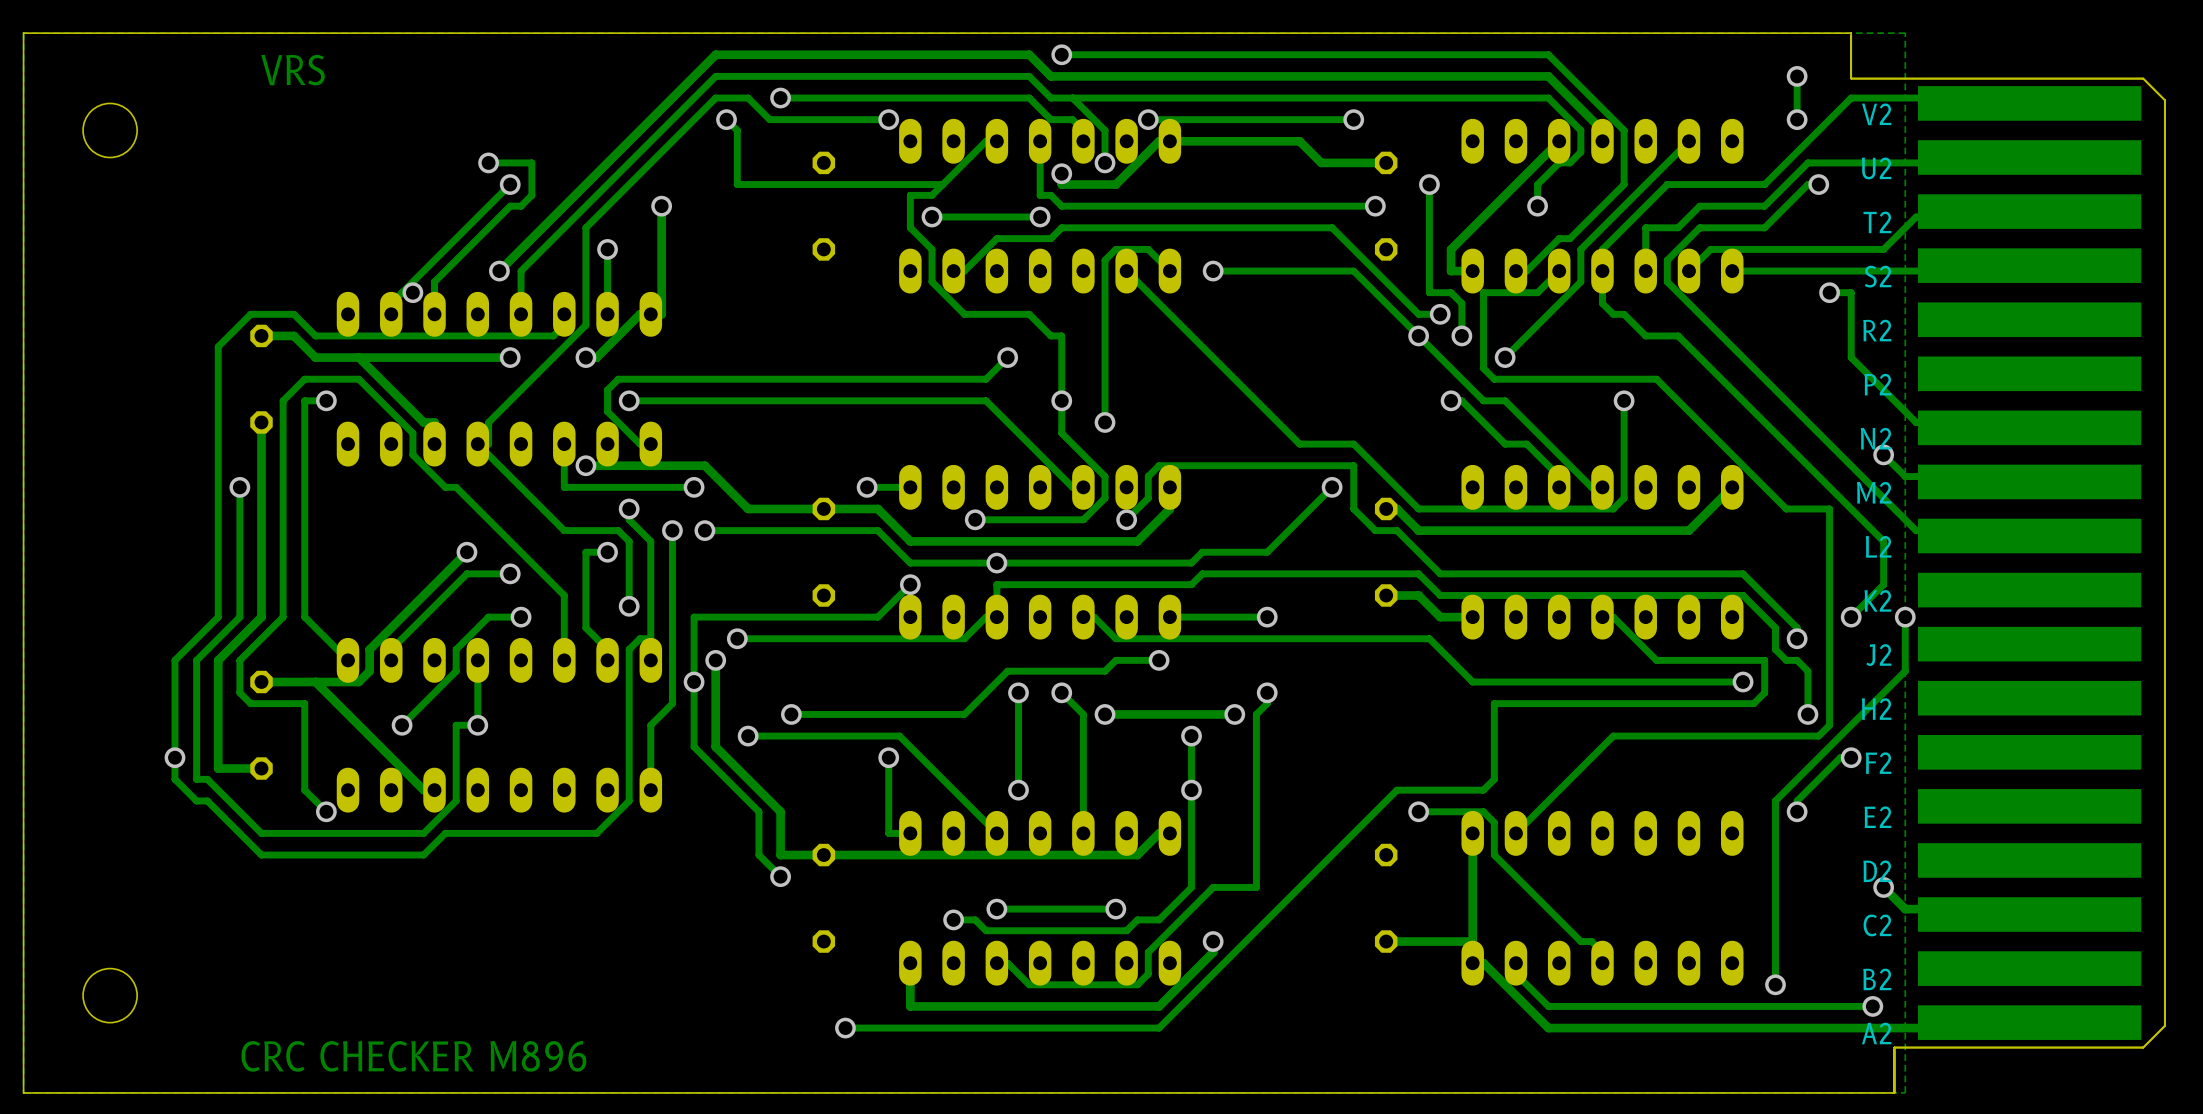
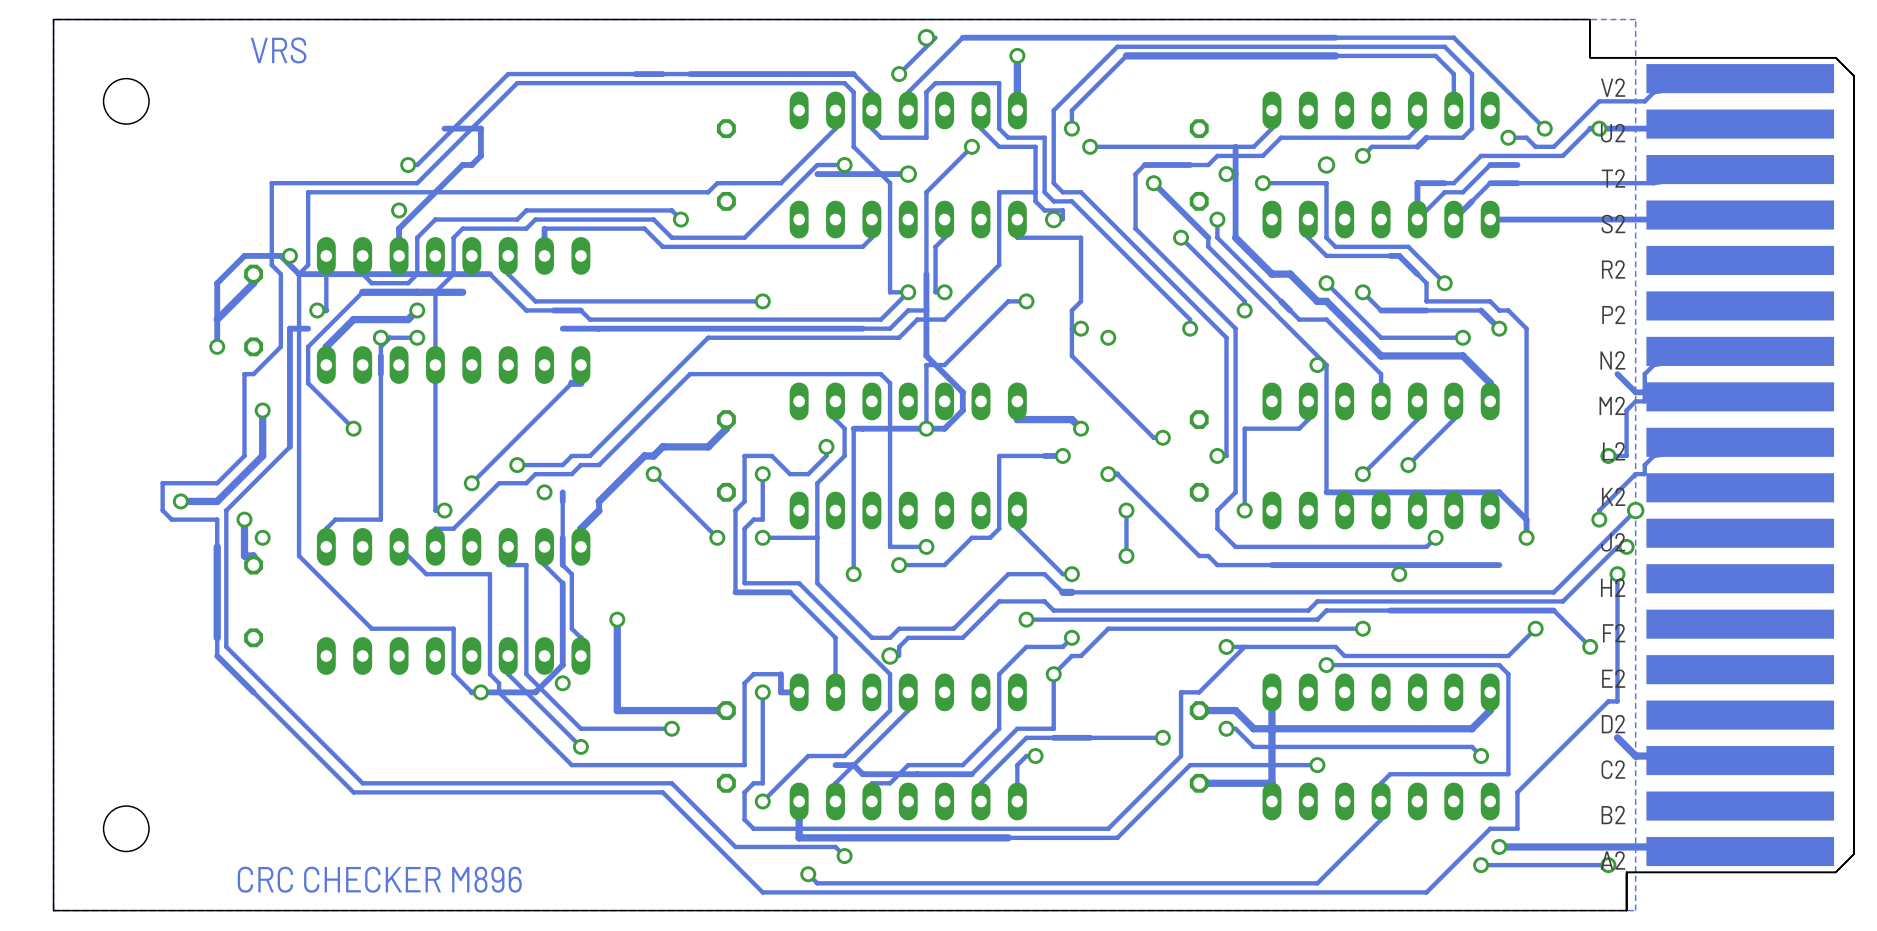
track: none -> (935, 37) (899, 74)
track: (1105, 54) (1061, 54) -> (962, 37) (908, 92) (908, 110)
track: (1548, 54) (1624, 130) (1624, 184) (1570, 238) (1559, 238) (1526, 271) (1515, 271) -> (1390, 255) (1326, 255) (1308, 237) (1308, 219)
track: none -> (1335, 37) (1453, 37) (1544, 128)
track: none -> (1017, 55) (1017, 110)
via: none -> (1017, 55)
track: (1299, 76) (1050, 76) (1029, 54) (715, 54) (499, 271) -> (1126, 55) (1071, 110) (1071, 128)
track: (1548, 76) (1602, 130) (1602, 141) -> (1335, 55) (1435, 55) (1453, 74) (1453, 110)
track: (1797, 76) (1797, 119) -> none
via: (1797, 76) -> none
track: (715, 98) (585, 227) (585, 325) (488, 422) (488, 444) (477, 444) (564, 530) (618, 530) (629, 541) (629, 595) -> (635, 74) (508, 74) (417, 165) (408, 165)
track: (748, 98) (769, 119) (888, 119) -> (662, 74) (690, 74)
via: (780, 98) -> none
track: (975, 98) (1029, 98) (1050, 119) (1072, 119) (1083, 130) (1083, 141) -> (853, 74) (871, 92) (871, 128) (880, 137) (926, 137) (926, 92) (935, 83) (999, 83) (999, 128) (1008, 137) (1044, 137) (1044, 192) (1053, 201) (1071, 201) (1190, 319) (1190, 328)
via: none -> (899, 74)
track: (1072, 98) (1105, 130) (1105, 162) -> none
track: (2029, 103) (2024, 98) (1851, 98) (1764, 184) (1667, 184) (1602, 249) (1602, 303) (1613, 314) -> (1740, 78) (1653, 92) (1644, 101) (1599, 101) (1553, 146) (1535, 146) (1526, 137) (1508, 137)
track: (726, 119) (737, 130) (737, 184) (942, 184) -> none
via: (726, 119) -> none
via: (888, 119) -> none
via: (1148, 119) -> none
track: (1353, 119) (1148, 119) -> none
via: (1353, 119) -> none
via: (1797, 119) -> none
track: (996, 141) (986, 141) (931, 195) (910, 195) (910, 227) (931, 249) (931, 281) (964, 314) (1029, 314) (1050, 335) (1061, 335) -> (971, 146) (926, 192) (926, 274)
track: (1040, 141) (1040, 195) (1050, 195) (1061, 206) (1321, 206) -> (1435, 537) (1426, 546) (1235, 546) (1217, 528) (1217, 510) (1235, 492) (1235, 328) (1135, 228) (1135, 174) (1144, 165)
track: none -> (981, 110) (981, 128) (999, 146) (1035, 146) (1035, 201) (1044, 210) (1062, 210) (1062, 219)
track: none -> (1271, 110) (1271, 128) (1253, 146) (1090, 146)
track: (1559, 141) (1451, 249) (1451, 271) (1472, 271) -> none
track: none -> (1417, 110) (1417, 128) (1408, 137) (1281, 137) (1262, 155) (1217, 155) (1208, 165) (1190, 165)
track: (1688, 141) (1656, 173) -> (1217, 455) (1226, 455) (1226, 337) (1081, 192) (1062, 192) (1053, 183) (1053, 110) (1117, 46) (1444, 46) (1472, 74) (1472, 128) (1462, 137) (1426, 137)
via: (488, 162) -> none
via: (1105, 162) -> none
via: none -> (1071, 128)
track: (1386, 162) (1321, 162) (1299, 141) (1159, 141) (1115, 184) (1061, 184) (1061, 173) -> none
via: none -> (1544, 128)
track: (1851, 162) (1807, 162) (1764, 206) -> (1590, 128) (1562, 155) (1481, 155) (1453, 183) (1444, 183)
via: none -> (1599, 128)
via: (1061, 173) -> none
via: none -> (1508, 137)
track: (510, 184) (391, 303) (391, 314) -> (680, 219) (671, 210) (526, 210) (517, 219) (435, 219) (417, 237) (417, 274) (408, 283) (371, 283) (362, 274) (362, 255)
via: (510, 184) -> none
via: none -> (971, 146)
via: none -> (1090, 146)
via: (1429, 184) -> none
track: (1645, 184) (1580, 249) (1580, 281) (1505, 357) -> (1417, 146) (1371, 146) (1362, 155)
track: (1818, 184) (1807, 184) (1764, 227) -> none
via: (1818, 184) -> none
via: none -> (1362, 155)
via: none -> (408, 165)
track: (661, 206) (661, 314) (640, 314) (596, 357) (585, 357) -> none
via: (661, 206) -> none
track: none -> (844, 165) (817, 165) (744, 237) (671, 237) (653, 219) (535, 219) (526, 228) (462, 228) (453, 237) (453, 274) (435, 292) (435, 510) (444, 510)
via: none -> (844, 165)
via: (1375, 206) -> none
track: (1537, 206) (1537, 184) (1559, 162) (1570, 162) (1580, 152) (1580, 130) (1548, 98) (1050, 98) (1029, 76) (715, 76) (521, 271) (521, 314) -> none
track: (1732, 206) (1699, 206) (1678, 227) -> (1490, 165) (1462, 192) (1444, 192) (1417, 219)
track: (2029, 211) (2024, 216) (1916, 216) (1883, 249) (1710, 249) -> (1740, 169) (1653, 183) (1517, 183)
via: (931, 216) -> none
via: none -> (1226, 174)
track: (1332, 227) (1061, 227) (1050, 238) (996, 238) (964, 271) (953, 271) -> none
via: none -> (1153, 183)
track: none -> (1262, 183) (1326, 183) (1326, 237) (1335, 246) (1408, 246) (1444, 283)
via: none -> (1262, 183)
track: (1732, 227) (1699, 227) (1667, 260) (1667, 281) (1916, 530) (2024, 530) (2029, 536) -> (1599, 519) (1599, 510) (1635, 474) (1644, 474) (1644, 465) (1653, 455) (1740, 442)
track: none -> (1490, 183) (1472, 201)
track: none -> (1035, 192) (999, 192) (999, 265) (944, 319) (917, 319) (899, 337) (708, 337) (590, 455) (571, 455) (562, 465) (517, 465)
track: (607, 249) (607, 281) -> (871, 219) (871, 237) (862, 246) (662, 246) (644, 228) (544, 228)
via: (607, 249) -> none
via: none -> (399, 210)
via: (499, 271) -> none
via: none -> (680, 219)
track: none -> (944, 219) (944, 237) (935, 246) (935, 292) (944, 292)
track: (1126, 271) (1299, 444) (1353, 444) (1418, 508) (1613, 508) (1624, 498) (1624, 400) -> none
track: (1169, 271) (1148, 249) (1115, 249) (1105, 260) (1105, 422) -> (1017, 219) (1017, 237) (1081, 237) (1081, 301) (1071, 310) (1071, 355) (1153, 437) (1162, 437)
track: (1213, 271) (1353, 271) (1483, 400) (1505, 400) (1591, 487) (1602, 487) -> (1290, 310) (1299, 319) (1326, 319) (1381, 374) (1381, 401)
via: none -> (1217, 219)
track: (1559, 271) (1537, 292) (1483, 292) (1483, 368) -> (1217, 219) (1217, 237) (1281, 301)
via: (412, 292) -> none
track: none -> (1181, 237) (1244, 301) (1244, 310)
via: none -> (1181, 237)
track: (1397, 292) (1418, 314) (1440, 314) -> (1208, 237) (1208, 246) (1326, 365)
track: (1429, 292) (1451, 292) (1461, 303) (1461, 335) -> none
track: (1829, 292) (1851, 292) (1851, 357) (1916, 422) (2024, 422) (2029, 427) -> (1608, 455) (1626, 455) (1626, 410) (1635, 401) (1644, 401) (1644, 374) (1653, 365) (1740, 351)
via: (1829, 292) -> none
via: none -> (289, 255)
track: none -> (326, 255) (326, 310)
via: (1440, 314) -> none
track: (564, 325) (553, 335) (542, 335) -> (553, 310) (526, 310) (489, 274)
track: none -> (508, 265) (508, 274) (535, 301) (762, 301)
track: (261, 335) (293, 335) (315, 357) (391, 357) -> (253, 274) (253, 283) (217, 319)
via: (1418, 335) -> none
via: (1461, 335) -> none
track: (1645, 335) (1678, 335) (1721, 379) -> (1426, 310) (1481, 310)
track: none -> (1417, 274) (1426, 283) (1426, 301) (1490, 301) (1499, 310) (1508, 310) (1526, 328) (1526, 519)
track: none -> (1326, 283) (1381, 337) (1462, 337)
via: none -> (1326, 283)
via: none -> (1444, 283)
track: (358, 357) (423, 422) (434, 422) (434, 444) -> none
track: none -> (362, 292) (308, 346) (308, 383) (353, 428)
via: (510, 357) -> none
via: (585, 357) -> none
track: (1007, 357) (986, 379) (650, 379) -> none
via: (1007, 357) -> none
via: none -> (908, 292)
via: none -> (944, 292)
via: (1505, 357) -> none
via: none -> (1362, 292)
via: none -> (762, 301)
track: none -> (1026, 301) (1008, 301) (944, 365) (926, 365) (926, 428)
via: none -> (1026, 301)
track: (337, 379) (304, 379) (283, 400) (283, 617) (239, 660) (239, 692) (250, 703) (304, 703) (304, 790) (326, 811) -> none
via: none -> (317, 310)
track: (348, 379) (358, 379) (412, 433) -> (389, 337) (380, 346) (380, 355)
track: none -> (417, 310) (408, 319) (353, 319) (326, 346) (326, 365)
via: none -> (417, 310)
track: (618, 379) (607, 390) (607, 411) (640, 444) (650, 444) -> none
via: none -> (1244, 310)
track: (1602, 379) (1494, 379) -> (1381, 310) (1362, 292)
track: (1656, 379) (1786, 508) (1829, 508) (1829, 725) (1818, 736) (1807, 736) -> (1590, 646) (1553, 610)
via: (326, 400) -> none
via: (629, 400) -> none
track: (986, 400) (1072, 487) (1083, 487) -> (862, 328) (890, 328) (908, 310) (926, 310)
via: (1061, 400) -> none
via: none -> (1081, 328)
via: none -> (1190, 328)
track: (1451, 400) (1461, 400) (1505, 444) (1526, 444) (1559, 476) (1559, 487) -> none
via: (1451, 400) -> none
via: (1624, 400) -> none
track: (1743, 400) (1883, 541) (1883, 584) (1851, 617) -> none
via: none -> (1499, 328)
via: none -> (380, 337)
track: none -> (417, 337) (380, 337)
via: none -> (417, 337)
via: none -> (1108, 337)
via: none -> (1462, 337)
track: (218, 422) (218, 617) (174, 660) (174, 779) (196, 800) (207, 800) (261, 855) (423, 855) (445, 833) (521, 833) -> (835, 110) (835, 128) (780, 183) (717, 183) (708, 192) (308, 192) (308, 265) (299, 274) (299, 555) (371, 628) (453, 628) (453, 674) (471, 692)
via: none -> (217, 346)
track: (261, 422) (261, 617) (218, 660) -> (580, 310) (590, 319) (880, 319) (908, 292) (890, 292) (890, 183) (853, 146) (853, 92) (844, 83) (517, 83) (417, 183) (271, 183) (271, 265) (280, 274) (280, 346) (253, 374) (244, 374) (244, 455) (217, 483) (162, 483) (162, 510) (171, 519) (217, 519) (217, 546)
via: (1105, 422) -> none
track: (564, 444) (564, 487) (694, 487) -> none
via: none -> (1317, 365)
track: none -> (1326, 365) (1326, 492)
track: (412, 454) (445, 487) (456, 487) (564, 595) (564, 660) -> (671, 728) (580, 728) (526, 674) (526, 565) (508, 565) (508, 546)
via: (1883, 454) -> none
via: (585, 465) -> none
track: (640, 465) (585, 465) -> (571, 383) (471, 483)
track: (650, 465) (704, 465) (748, 508) (877, 508) (910, 541) (1137, 541) (1169, 508) -> (1081, 428) (1071, 419) (1017, 419)
track: (239, 487) (239, 617) (196, 660) (196, 779) (207, 779) (218, 790) -> none
via: (239, 487) -> none
via: (694, 487) -> none
via: (867, 487) -> none
track: (910, 487) (867, 487) -> none
track: (1332, 487) (1267, 552) (1223, 552) -> none
via: (1332, 487) -> none
track: none -> (1308, 401) (1308, 419) (1299, 428) (1244, 428) (1244, 510)
track: none -> (1417, 401) (1417, 419) (1362, 474)
track: none -> (1453, 401) (1453, 419) (1408, 465)
track: (1732, 487) (1688, 530) (1418, 530) (1397, 508) (1386, 508) -> (1490, 401) (1490, 383) (1462, 355) (1381, 355) (1326, 301) (1317, 301) (1290, 274) (1271, 274) (1235, 237)
track: none -> (262, 410) (262, 455) (217, 501) (180, 501)
via: none -> (262, 410)
track: (629, 508) (629, 519) (650, 541) (650, 638) (640, 638) (629, 649) -> (562, 501) (562, 537)
via: (629, 508) -> none
via: none -> (353, 428)
track: none -> (853, 428) (853, 574)
via: (975, 519) -> none
via: none -> (926, 428)
track: (1126, 519) (1148, 498) (1148, 476) (1159, 465) (1353, 465) (1353, 508) (1375, 530) (1397, 530) (1440, 573) (1743, 573) (1797, 627) (1797, 638) -> none
via: (1126, 519) -> none
via: none -> (1081, 428)
track: (672, 530) (672, 606) -> (726, 419) (726, 428) (708, 446) (662, 446) (653, 455) (644, 455) (599, 501)
via: (672, 530) -> none
track: (704, 530) (877, 530) (910, 563) (1191, 563) (1202, 552) -> (899, 565) (944, 565) (971, 537) (990, 537) (999, 528) (999, 455) (1044, 455)
via: (704, 530) -> none
via: none -> (1162, 437)
track: (304, 541) (304, 617) (348, 660) -> (380, 374) (380, 519) (335, 519) (326, 528) (326, 546)
track: none -> (289, 446) (226, 510) (226, 646) (362, 783) (671, 783) (735, 846) (835, 846) (844, 856)
via: none -> (826, 446)
track: (466, 552) (369, 649) (369, 671) (358, 682) (261, 682) -> (244, 519) (244, 555) (253, 555) (253, 565)
via: (466, 552) -> none
track: (607, 552) (585, 552) (585, 627) (607, 649) (607, 660) -> none
via: (607, 552) -> none
via: none -> (1062, 455)
via: none -> (1217, 455)
via: none -> (1608, 455)
via: none -> (517, 465)
via: (996, 563) -> none
via: none -> (1408, 465)
track: (510, 573) (466, 573) (391, 649) (391, 660) -> none
via position: (510, 573) -> (471, 483)
track: none -> (653, 474) (717, 537)
via: none -> (653, 474)
track: none -> (762, 474) (762, 519) (753, 519) (744, 528) (744, 583) (799, 583) (890, 674) (890, 710) (844, 756) (808, 756) (762, 801)
via: none -> (762, 474)
track: (1278, 573) (1202, 573) (1191, 584) (996, 584) (996, 617) (986, 617) (964, 638) (737, 638) -> none
via: none -> (1108, 474)
track: (1288, 573) (1418, 573) (1440, 595) (1537, 595) -> (1117, 474) (1199, 555) (1208, 555) (1217, 565) (1271, 565)
via: none -> (1362, 474)
track: (910, 584) (877, 617) (694, 617) (694, 746) (758, 811) (758, 855) (780, 876) -> none
via: (910, 584) -> none
via: none -> (544, 492)
track: (1386, 595) (1418, 595) (1440, 617) (1472, 617) -> none
via: none -> (180, 501)
via: (629, 606) -> none
via: none -> (444, 510)
track: (521, 617) (488, 617) (456, 649) (456, 671) (402, 725) -> none
via: (521, 617) -> none
track: (672, 617) (672, 703) (650, 725) (650, 768) -> (562, 565) (571, 574) (571, 628) (580, 637)
track: none -> (599, 510) (580, 528) (580, 546)
track: (1083, 617) (1094, 617) (1115, 638) (1429, 638) (1472, 682) -> none
track: (1267, 617) (1169, 617) -> (1071, 574) (1062, 574) (1017, 528) (1017, 510)
via: (1267, 617) -> none
track: none -> (1126, 510) (1126, 555)
via: none -> (1126, 510)
via: none -> (1244, 510)
track: (1602, 617) (1613, 617) (1656, 660) (1764, 660) (1764, 692) (1753, 703) (1494, 703) (1494, 779) (1483, 790) (1397, 790) (1159, 1028) (845, 1028) -> none
via position: (1851, 617) -> (1599, 519)
track: (1905, 617) (1905, 671) (1775, 800) (1775, 984) -> (1635, 510) (1553, 592) (1071, 592)
via: none -> (244, 519)
via: (737, 638) -> none
via: (1797, 638) -> none
via: none -> (262, 537)
via: none -> (717, 537)
via: none -> (762, 537)
track: none -> (817, 537) (762, 537)
via: none -> (1435, 537)
track: (1775, 649) (1786, 660) (1797, 660) (1807, 671) (1807, 714) -> none
via: none -> (1526, 537)
track: (477, 660) (477, 725) (456, 725) (456, 800) (423, 833) (261, 833) -> (435, 546) (435, 528) (453, 528) (499, 483) (526, 483) (535, 474) (571, 474) (580, 465) (599, 465) (690, 374) (880, 374) (890, 383) (890, 546) (926, 546)
track: (715, 660) (715, 746) (780, 811) (780, 855) -> (617, 619) (617, 710) (690, 710)
via: (715, 660) -> none
via: none -> (926, 546)
track: (1159, 660) (1115, 660) (1105, 671) (1007, 671) (964, 714) (899, 714) -> (835, 692) (835, 637) (790, 592)
via: (1159, 660) -> none
track: none -> (1626, 546) (1617, 546) (1562, 601) (1317, 601) (1308, 610) (1053, 610) (1044, 601) (999, 601) (962, 637) (908, 637) (899, 646) (899, 656)
via: none -> (1626, 546)
via: none -> (1126, 555)
track: (315, 682) (423, 790) (434, 790) -> none
track: (629, 682) (629, 703) -> (544, 546) (544, 565) (562, 583)
via: (694, 682) -> none
via: (1743, 682) -> none
via: none -> (853, 574)
track: (1018, 692) (1018, 790) -> none
via position: (1018, 692) -> (899, 565)
track: (1061, 692) (1083, 714) (1083, 833) -> none
via: (1061, 692) -> none
via: none -> (1071, 574)
track: (1267, 692) (1267, 703) (1256, 714) (1256, 887) -> (1162, 737) (1090, 737)
via: (1267, 692) -> none
via: none -> (1399, 574)
track: none -> (1617, 574) (1617, 701) (1608, 701) (1517, 792) (1517, 828) (1490, 828) (1426, 892) (762, 892) (662, 792) (353, 792) (253, 692)
via: none -> (1617, 574)
via: (791, 714) -> none
track: (834, 714) (791, 714) -> (735, 592) (735, 510) (744, 501) (744, 455) (771, 455) (790, 474) (808, 474) (826, 455) (826, 446)
via: (1105, 714) -> none
track: (1223, 714) (1105, 714) -> (1062, 592) (1044, 574) (1008, 574) (953, 628) (899, 628) (890, 637) (871, 637) (817, 583) (817, 483) (844, 455) (844, 428) (835, 419) (835, 401)
via: (1234, 714) -> none
via: (1807, 714) -> none
via: (402, 725) -> none
via: (477, 725) -> none
track: (748, 736) (899, 736) (996, 833) -> none
via: (748, 736) -> none
track: (1191, 736) (1191, 887) (1159, 919) (1137, 919) (1126, 930) (1115, 930) -> (1362, 628) (1108, 628) (1081, 656) (1071, 656) (1053, 674) (1053, 728) (1017, 728) (971, 774)
via position: (1191, 736) -> (1026, 619)
track: (1613, 736) (1515, 833) -> (1390, 610) (1326, 610) (1317, 619) (1026, 619)
via: none -> (617, 619)
via: (174, 757) -> none
track: (888, 757) (888, 811) -> (399, 546) (426, 574) (489, 574) (489, 674) (499, 683) (499, 692) (571, 765) (744, 765) (744, 683) (753, 674) (780, 674)
via: (888, 757) -> none
via: none -> (1362, 628)
track: none -> (1535, 628) (1508, 656) (1344, 656) (1335, 646) (1226, 646)
via: none -> (1535, 628)
track: (1851, 757) (1840, 757) (1797, 800) (1797, 811) -> none
via: (1851, 757) -> none
track: (261, 768) (218, 768) -> (217, 656) (217, 637)
via: none -> (1071, 637)
via: none -> (1226, 646)
track: none -> (1244, 646) (1199, 692) (1181, 692) (1181, 756) (1108, 828) (753, 828) (744, 819) (744, 792) (753, 783) (762, 783) (762, 692)
via: none -> (1590, 646)
track: none -> (508, 656) (508, 674) (580, 746)
via: (1191, 790) -> none
via: none -> (1326, 665)
via: (326, 811) -> none
via: none -> (1053, 674)
track: (1418, 811) (1483, 811) (1494, 822) (1494, 855) (1580, 941) (1591, 941) (1602, 952) -> (1326, 665) (1499, 665) (1508, 674) (1508, 774) (1390, 774) (1381, 783) (1381, 792)
via: (1418, 811) -> none
via: (1797, 811) -> none
via: none -> (562, 683)
via: none -> (480, 692)
via: none -> (762, 692)
track: none -> (908, 692) (908, 710) (835, 783) (835, 801)
track: (1169, 833) (1159, 833) (1137, 855) (823, 855) -> none
track: none -> (1490, 692) (1490, 710) (1472, 728) (1253, 728) (1235, 710) (1199, 710)
via: none -> (671, 728)
via: (780, 876) -> none
track: none -> (1226, 728) (1235, 728) (1253, 746) (1472, 746) (1481, 756)
via: none -> (1226, 728)
track: (1213, 887) (1148, 952) (1148, 973) (1137, 984) (1029, 984) (1007, 963) (996, 963) -> (1071, 637) (1062, 646) (1026, 646) (999, 674) (999, 728) (962, 765) (908, 765) (890, 783) (871, 783) (871, 801)
track: none -> (1053, 737) (1026, 737) (981, 783) (981, 801)
via: none -> (1162, 737)
via: (1883, 887) -> none
via: none -> (580, 746)
via: (996, 909) -> none
track: (1115, 909) (996, 909) -> none
via: (1115, 909) -> none
track: none -> (1035, 756) (1026, 756) (1017, 765) (1017, 801)
via: none -> (1035, 756)
via: none -> (1481, 756)
via: (953, 919) -> none
via: none -> (1317, 765)
track: (1213, 941) (1213, 952) (1159, 1006) -> (1317, 765) (1190, 765) (1117, 837) (1008, 837)
via: (1213, 941) -> none
via: none -> (762, 801)
track: (1472, 963) (1483, 963) (1548, 1028) (2024, 1028) (2029, 1022) -> (1499, 846) (1653, 846) (1740, 851)
track: (1515, 963) (1515, 973) (1548, 1006) (1872, 1006) -> none
track: none -> (1381, 801) (1381, 819) (1317, 883) (817, 883) (808, 874)
via: (1775, 984) -> none
via: (1872, 1006) -> none
via: none -> (1499, 846)
via: (845, 1028) -> none
via: none -> (844, 856)
via: none -> (1481, 865)
track: none -> (1608, 865) (1481, 865)
via: none -> (1608, 865)
via: none -> (808, 874)

